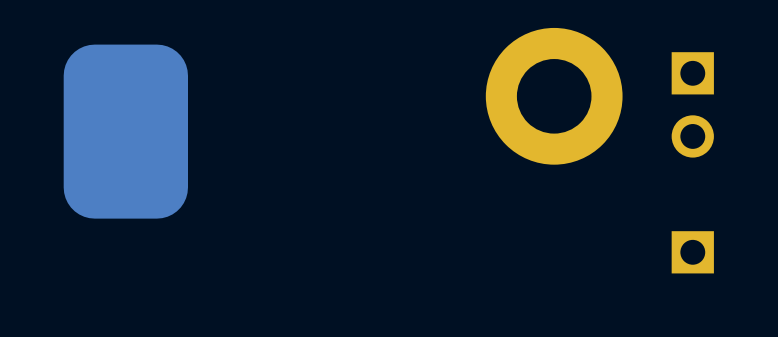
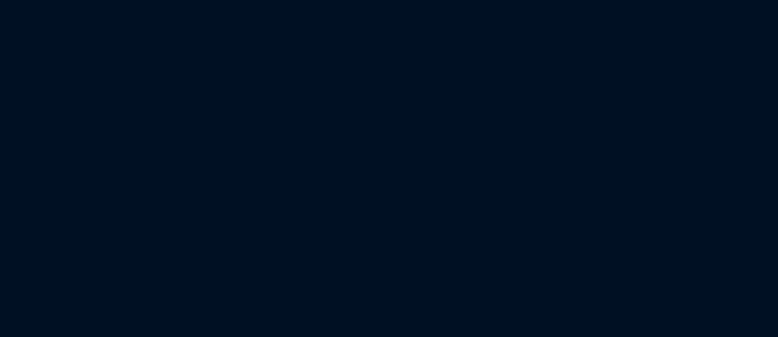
part: (554, 96) -> none
part: (692, 104) -> none
part: (125, 131) -> none
part: (692, 252) -> none

